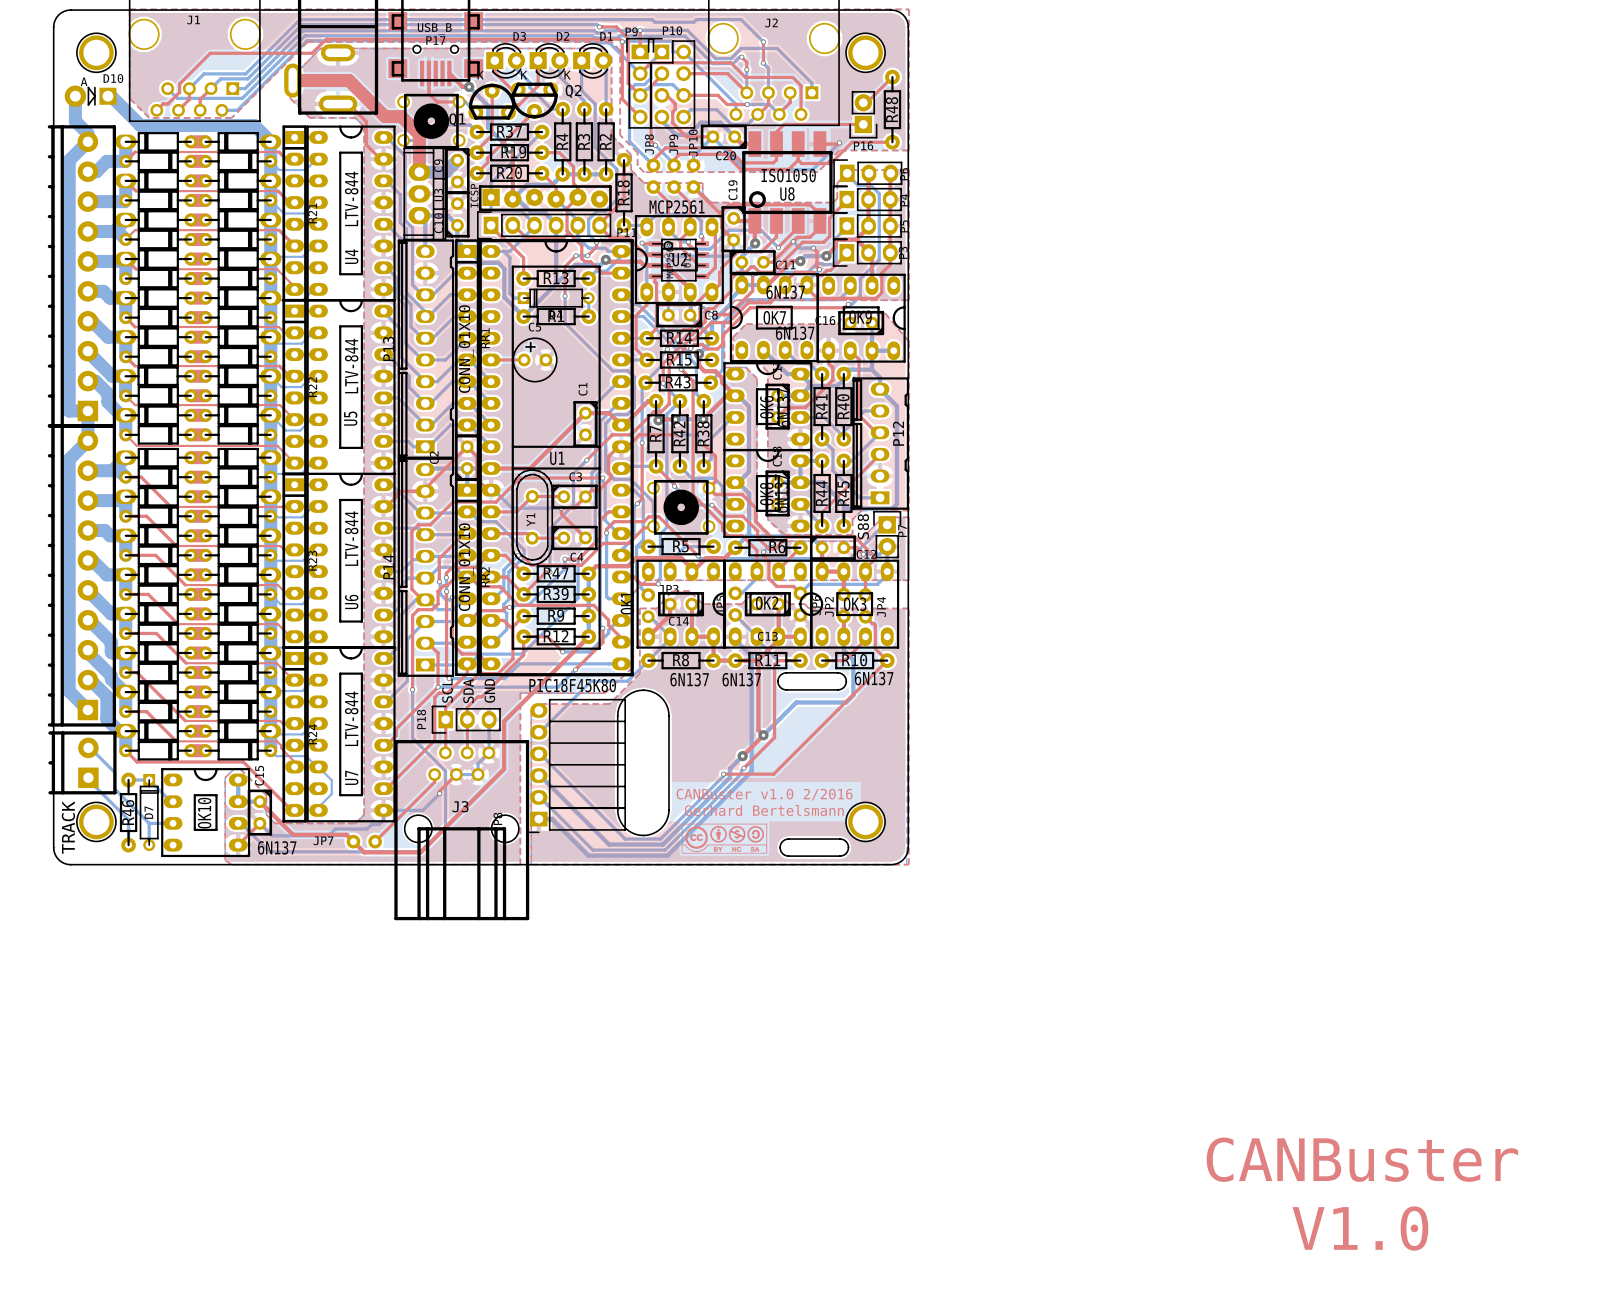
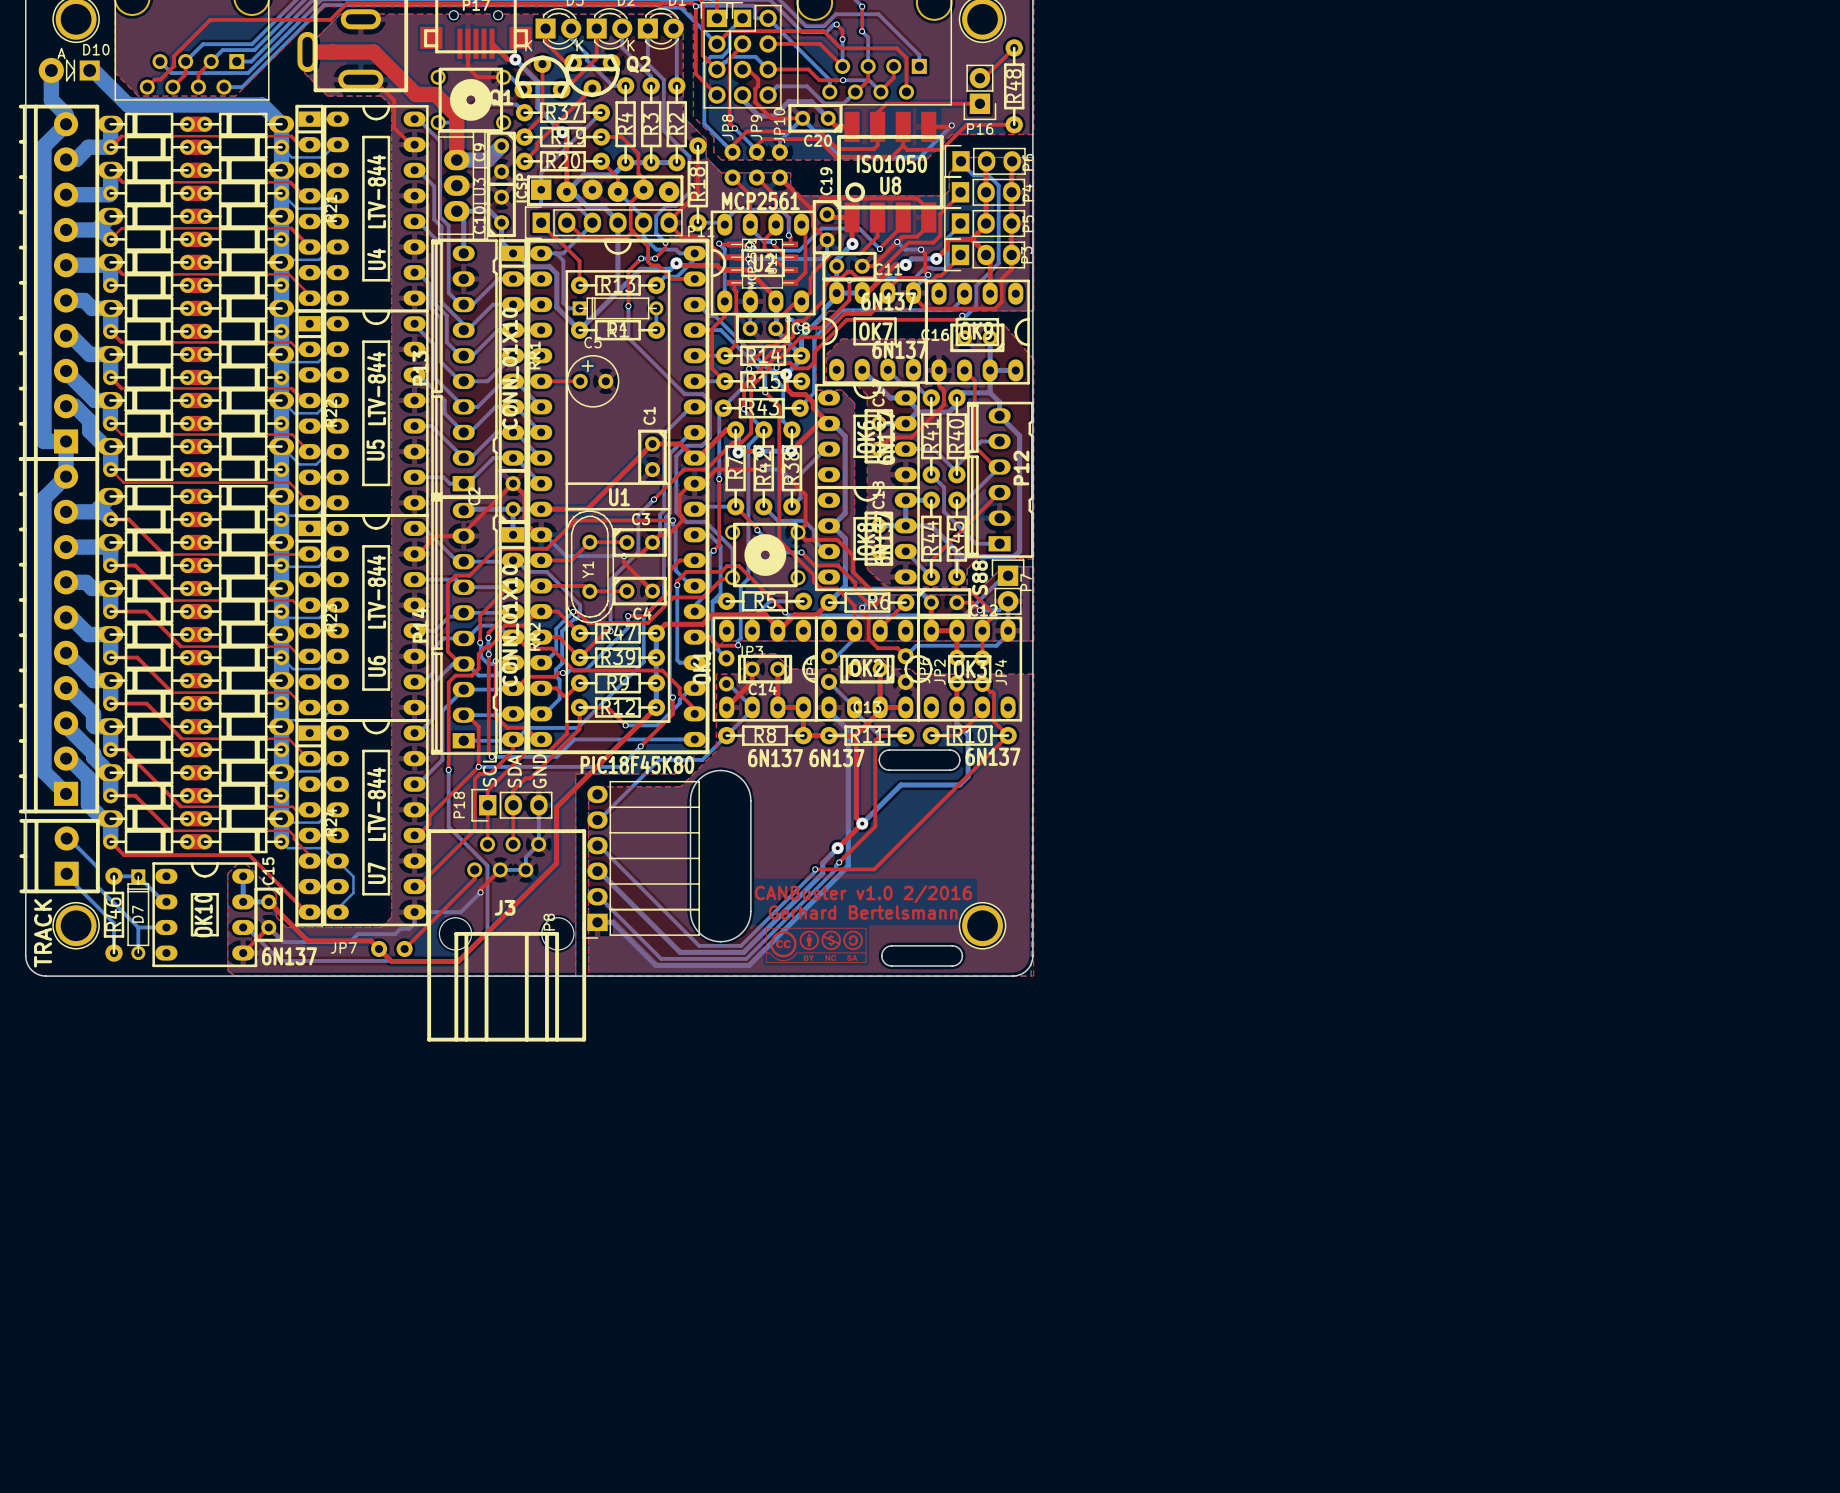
text: CANBuster (1362, 1159) -> none
text: V1.0 (1360, 1228) -> none

